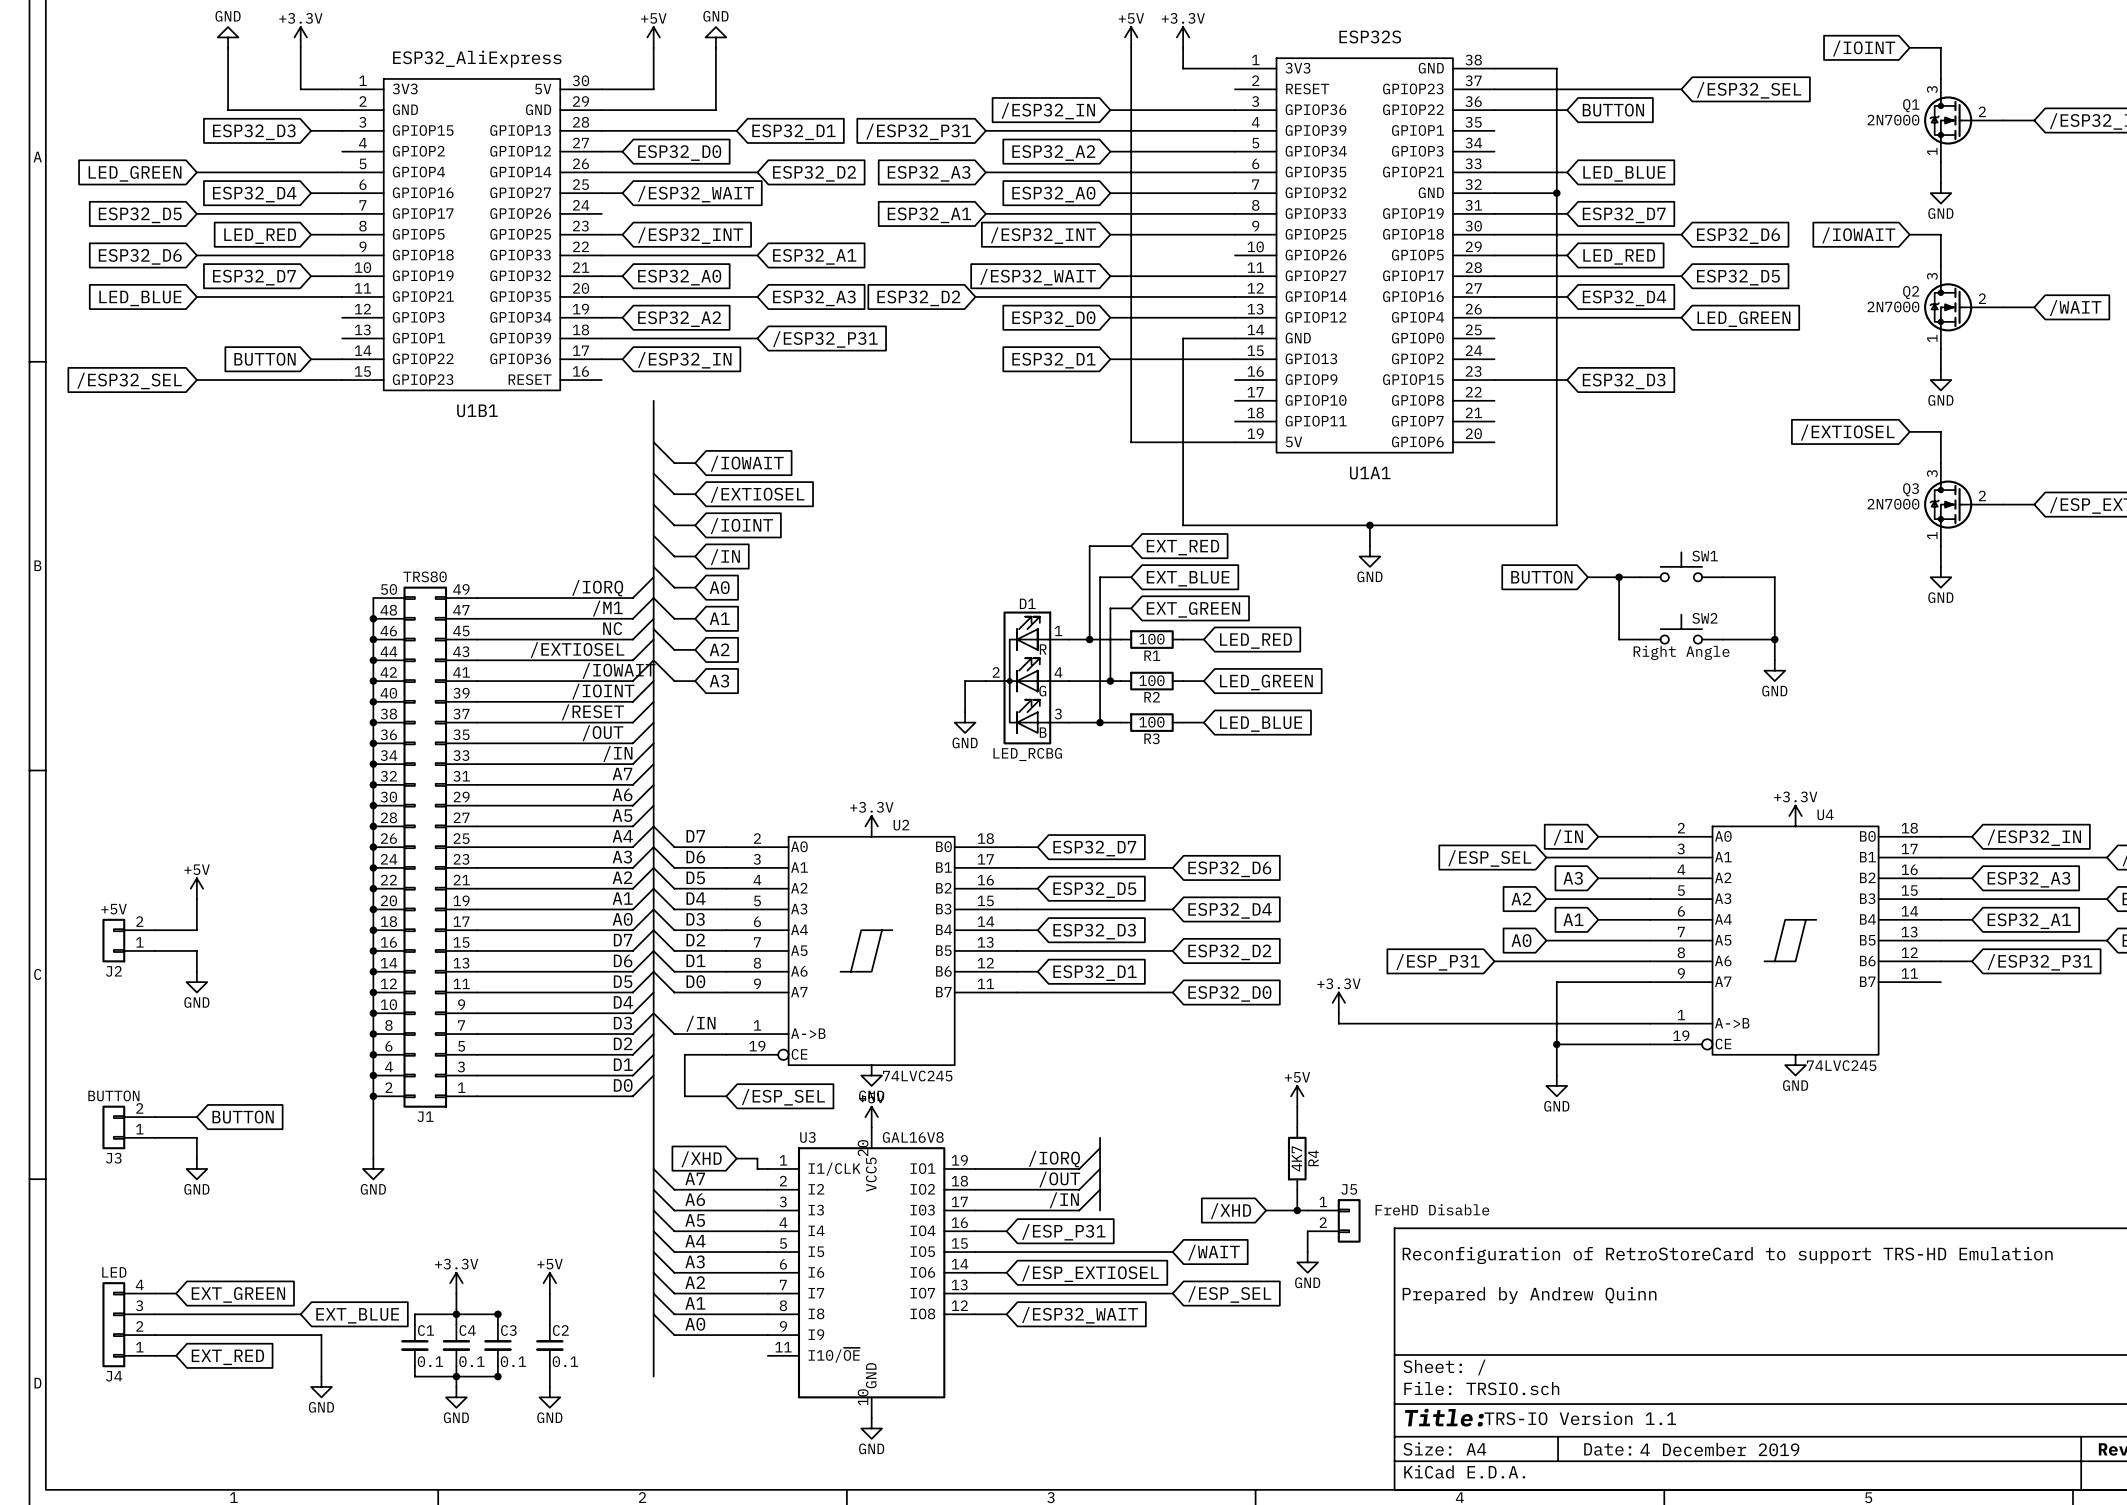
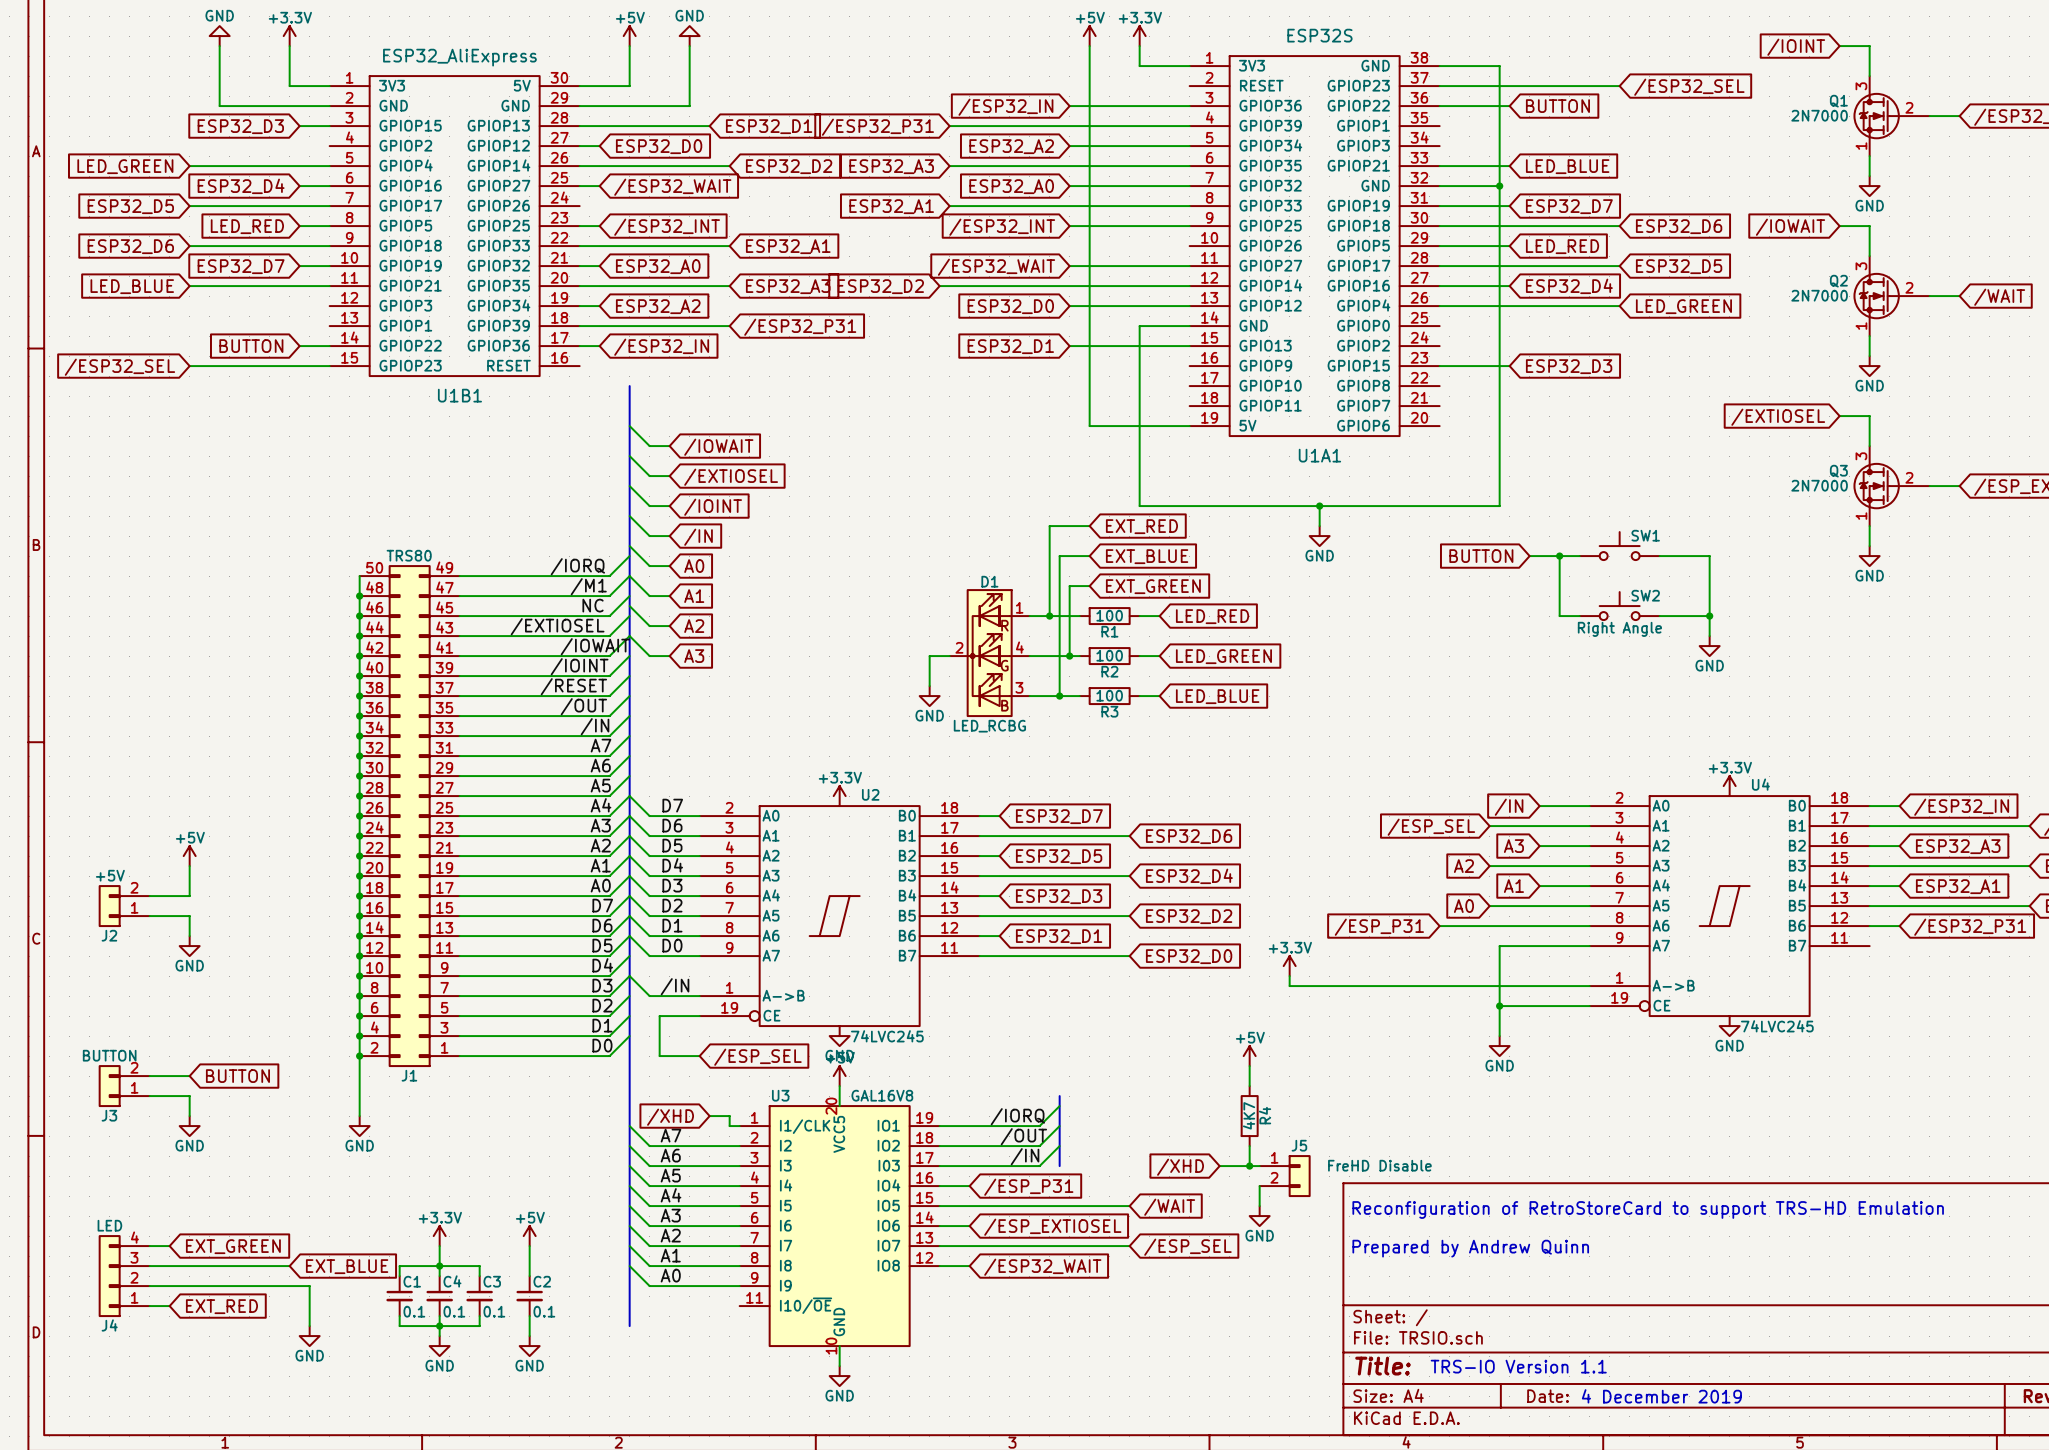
junction: (497, 1314) -> none
junction: (497, 1376) -> none

